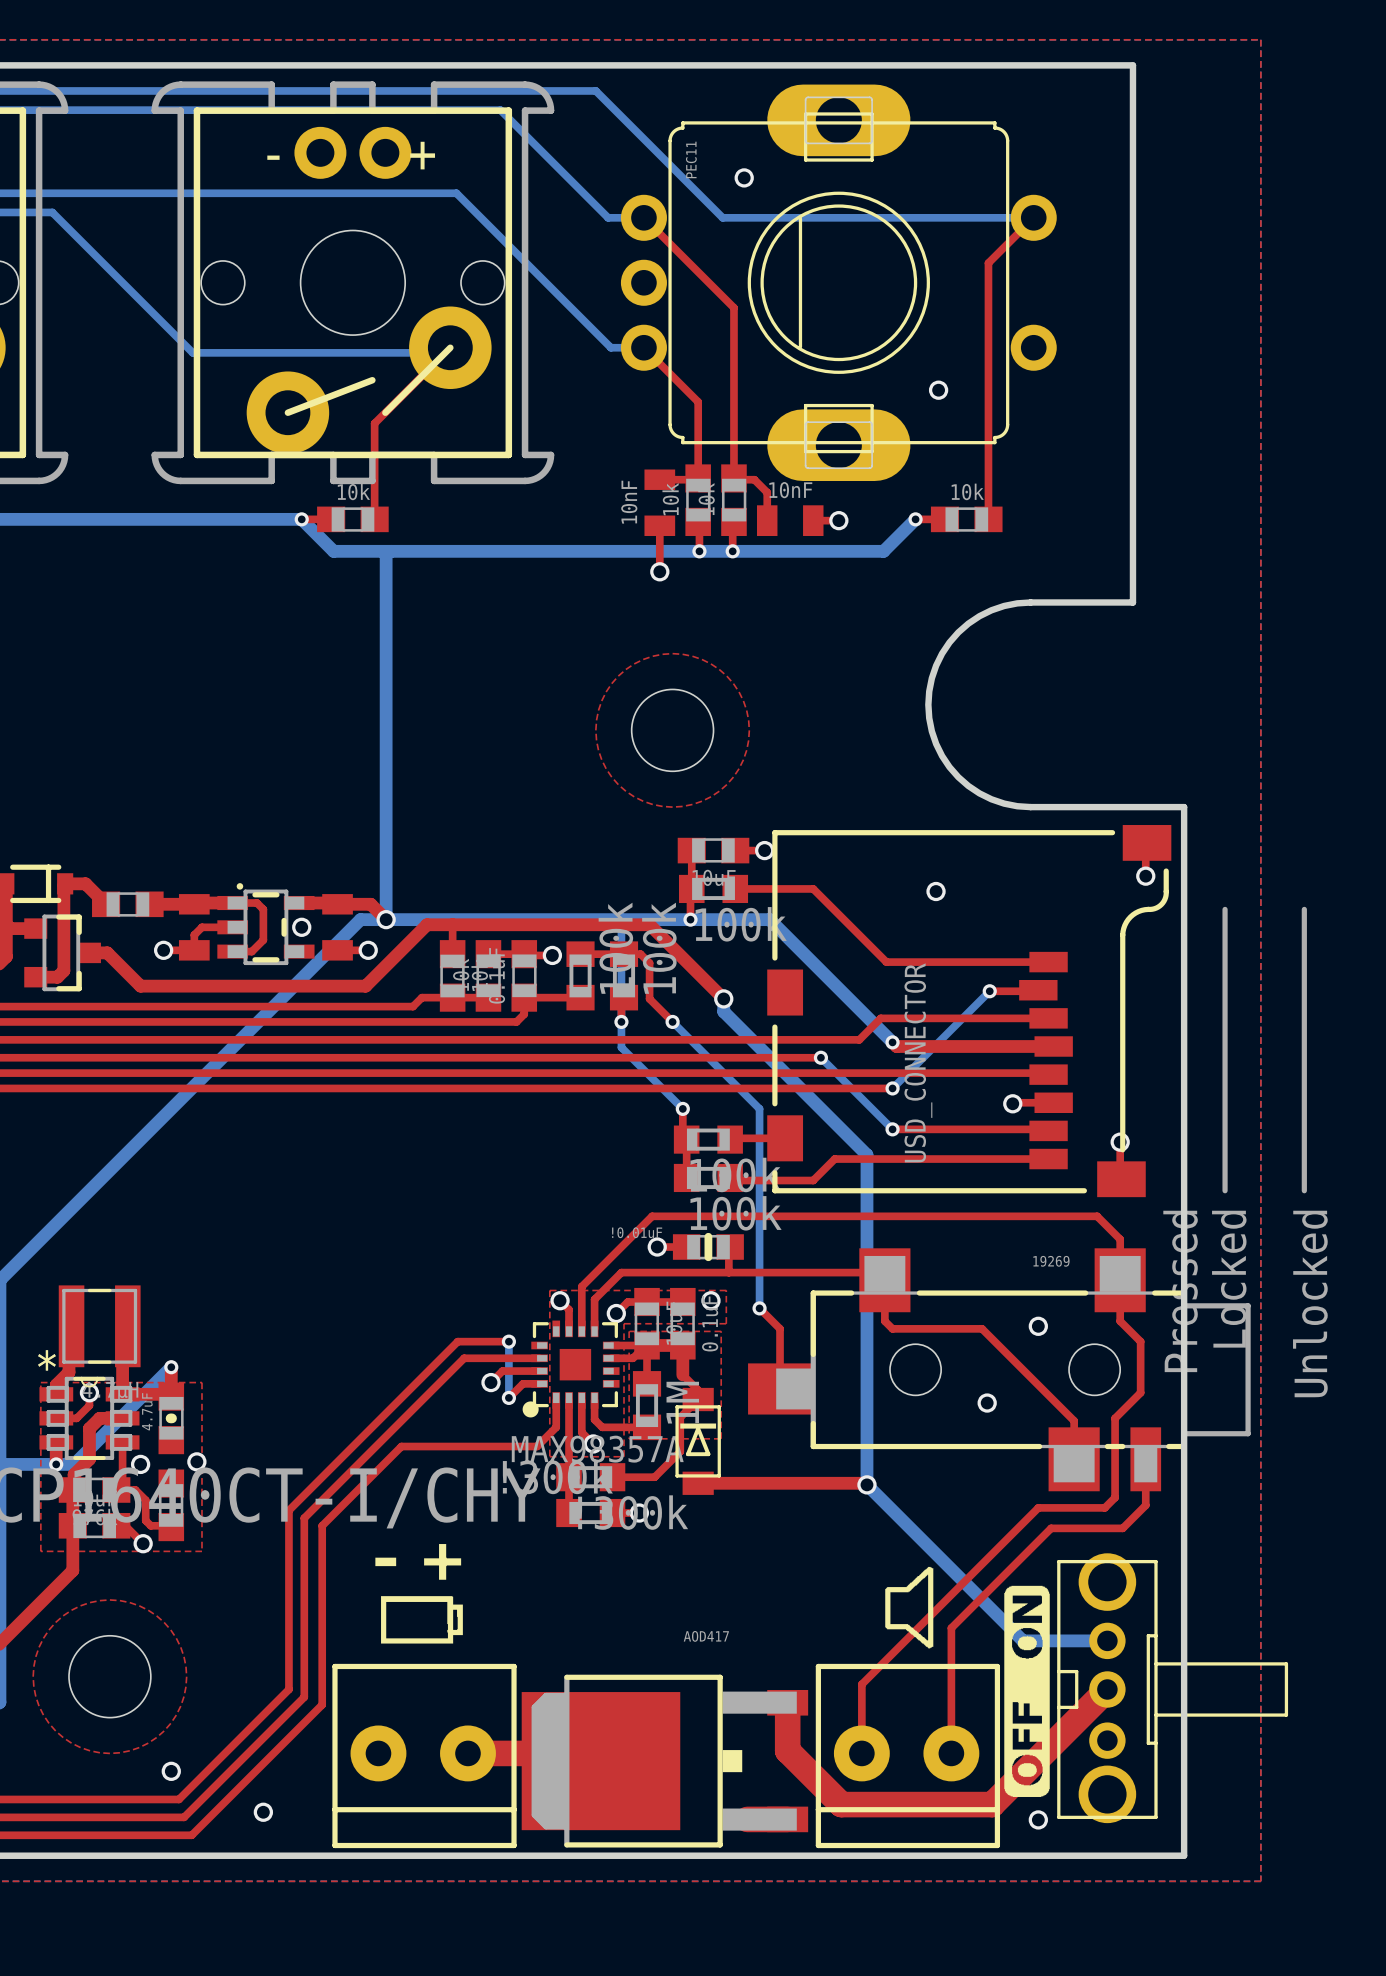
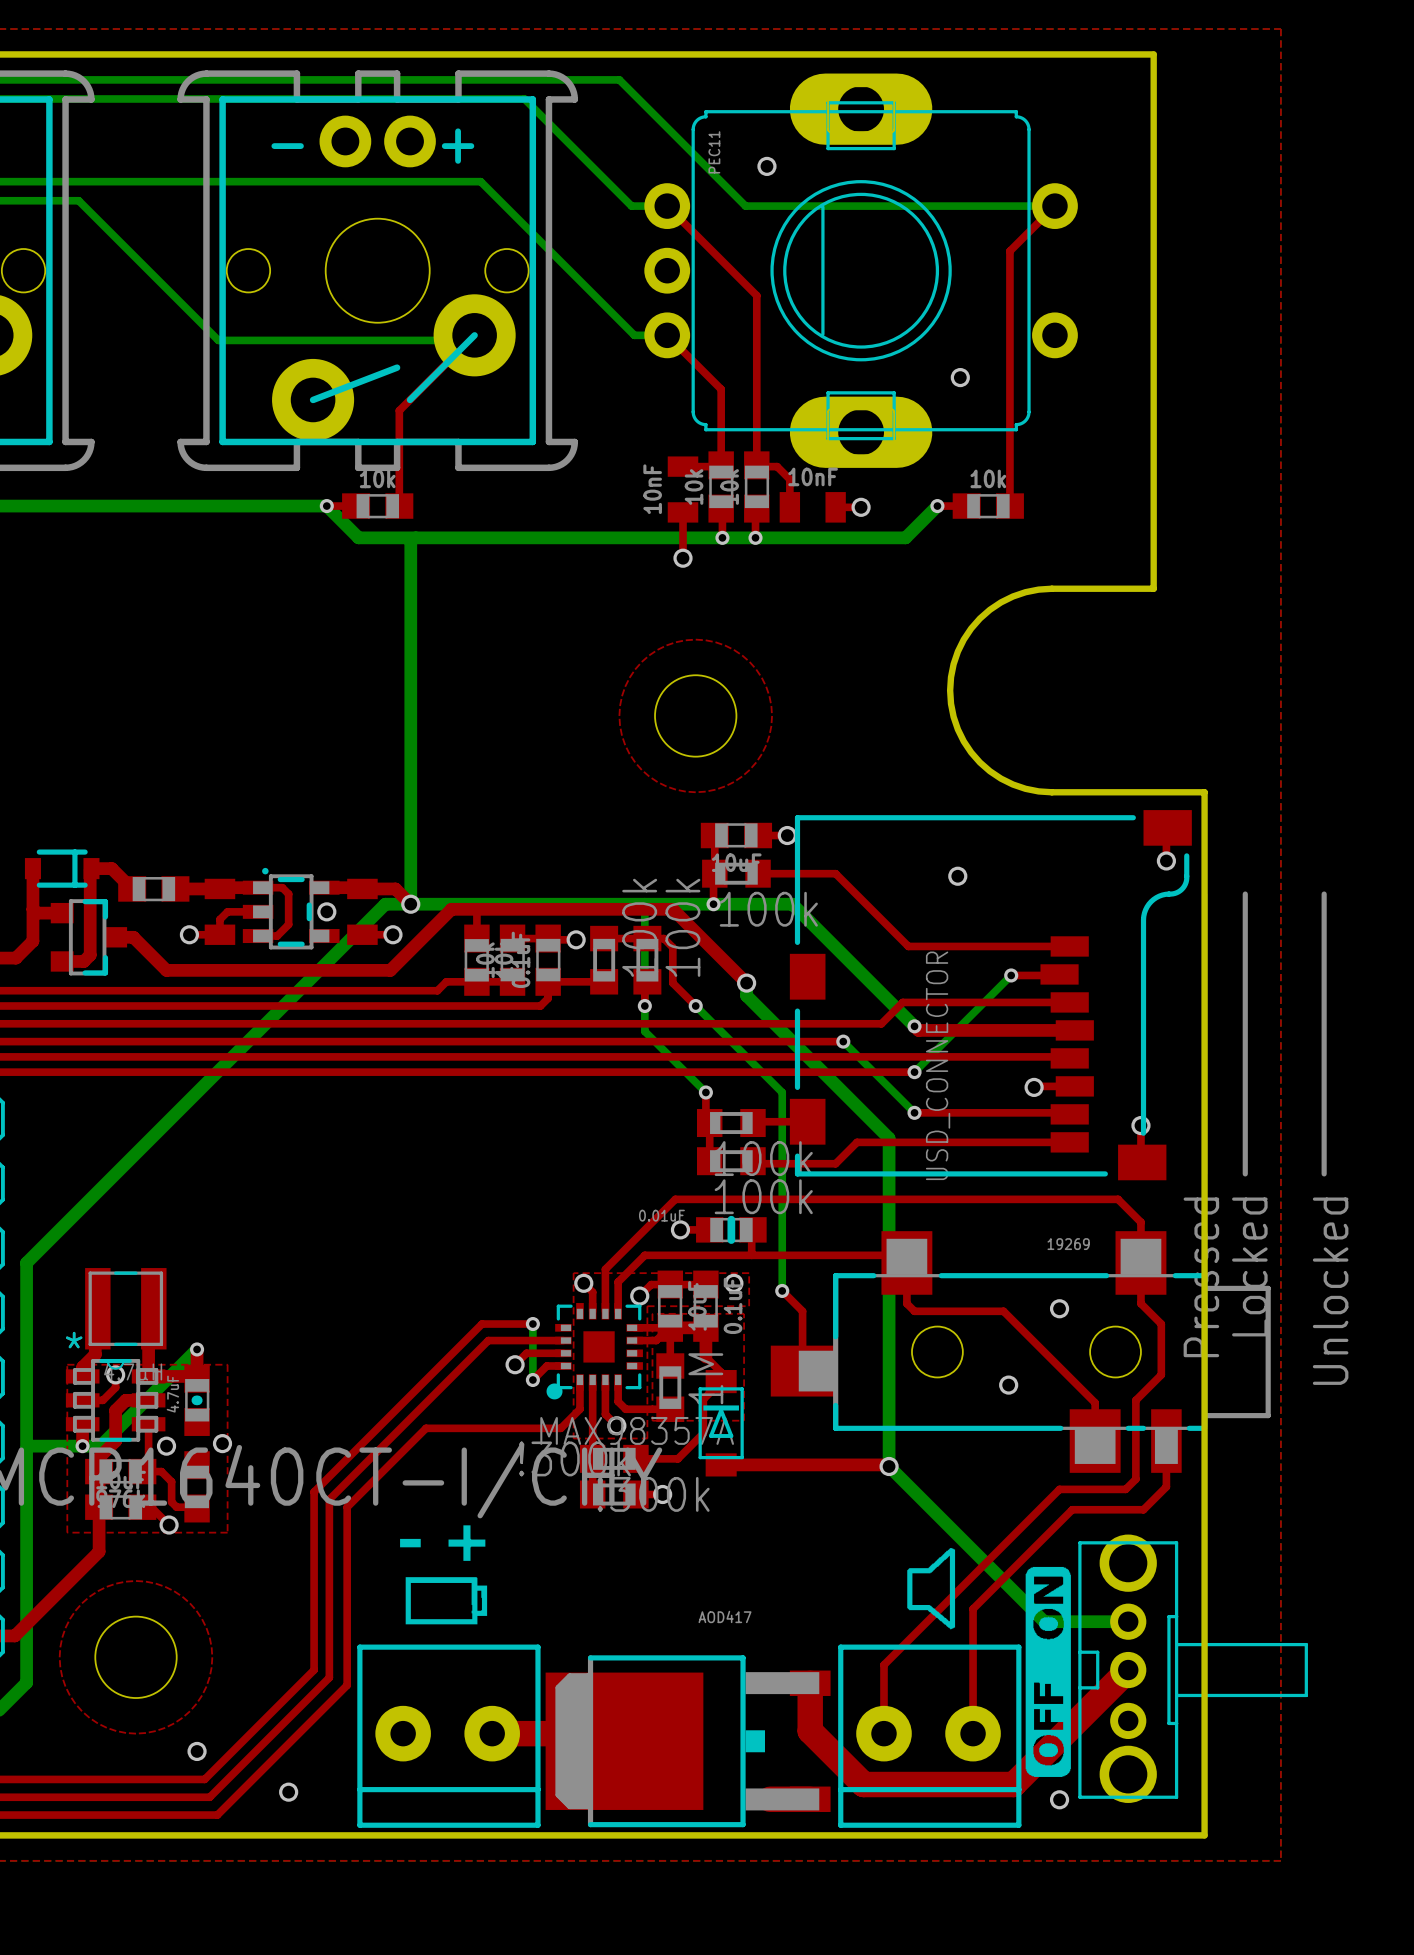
part value: !0.01uF (637, 1232) -> 0.01uF (661, 1215)

